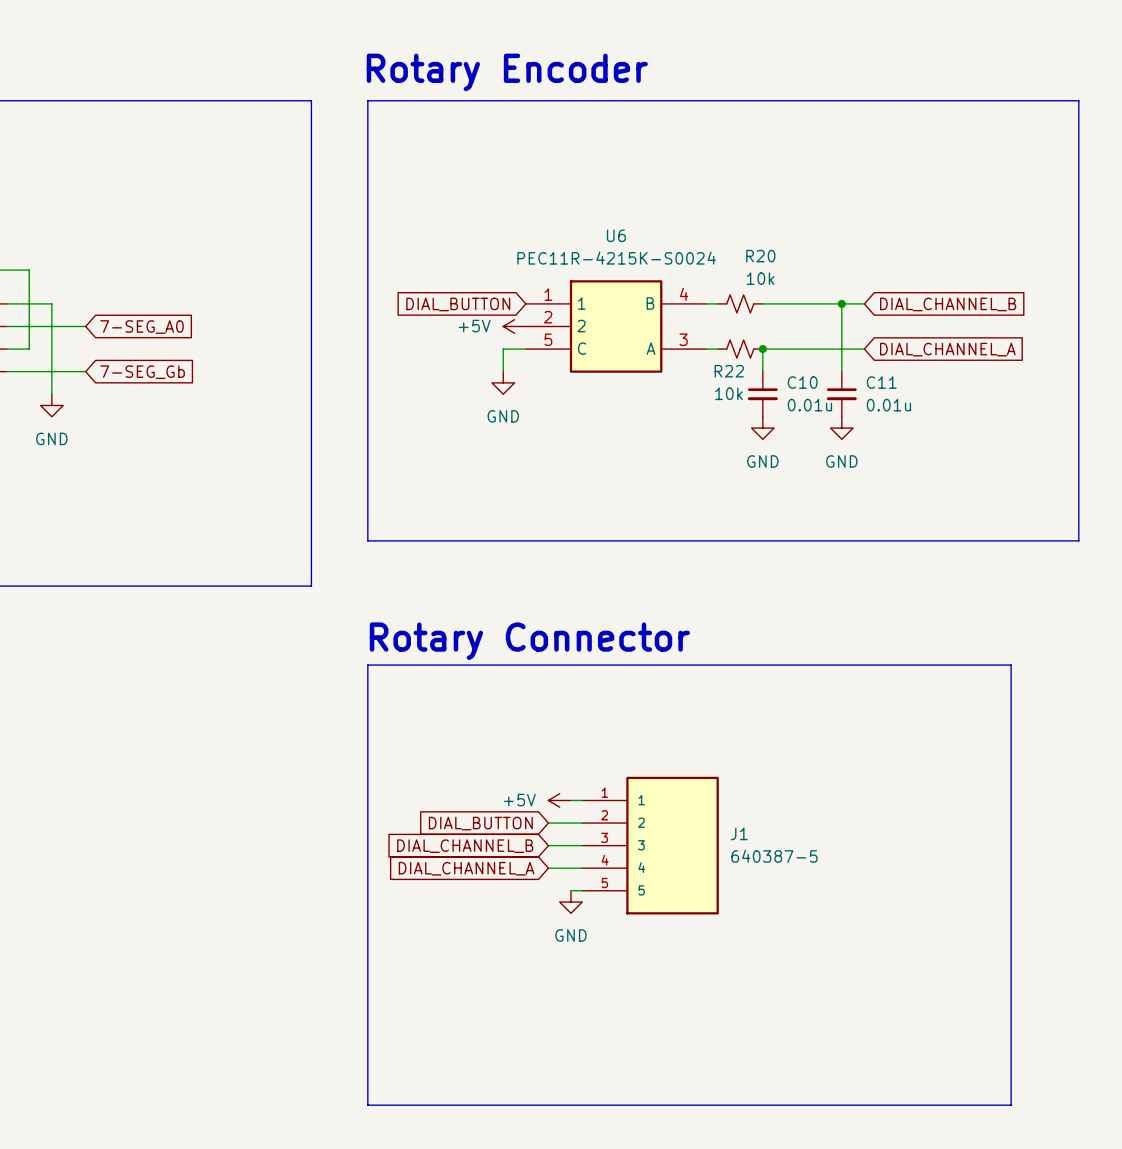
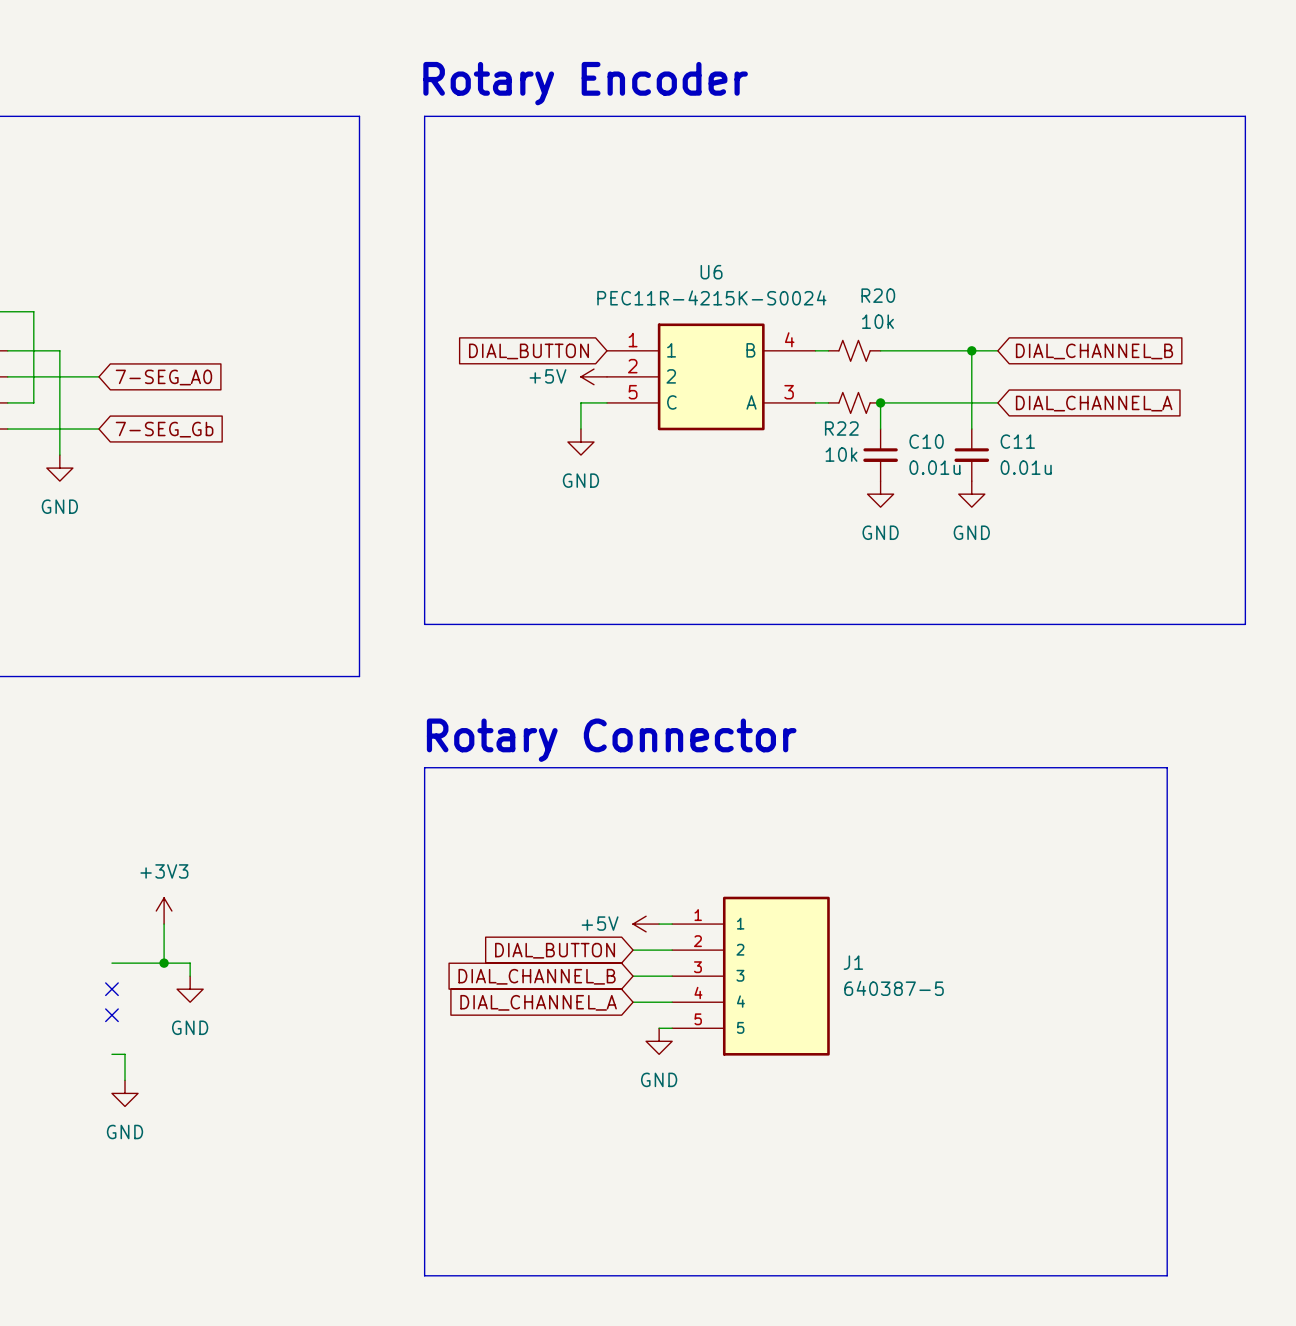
power symbol: none -> +3V3 (164, 911)
wire: none -> (164, 924) (164, 963)
wire: none -> (111, 963) (190, 963) (190, 976)
junction: none -> (164, 963)
no-connect mark: none -> (111, 989)
power symbol: none -> GND (190, 989)
no-connect mark: none -> (111, 1015)
wire: none -> (111, 1054) (124, 1054) (124, 1080)
power symbol: none -> GND (124, 1093)

